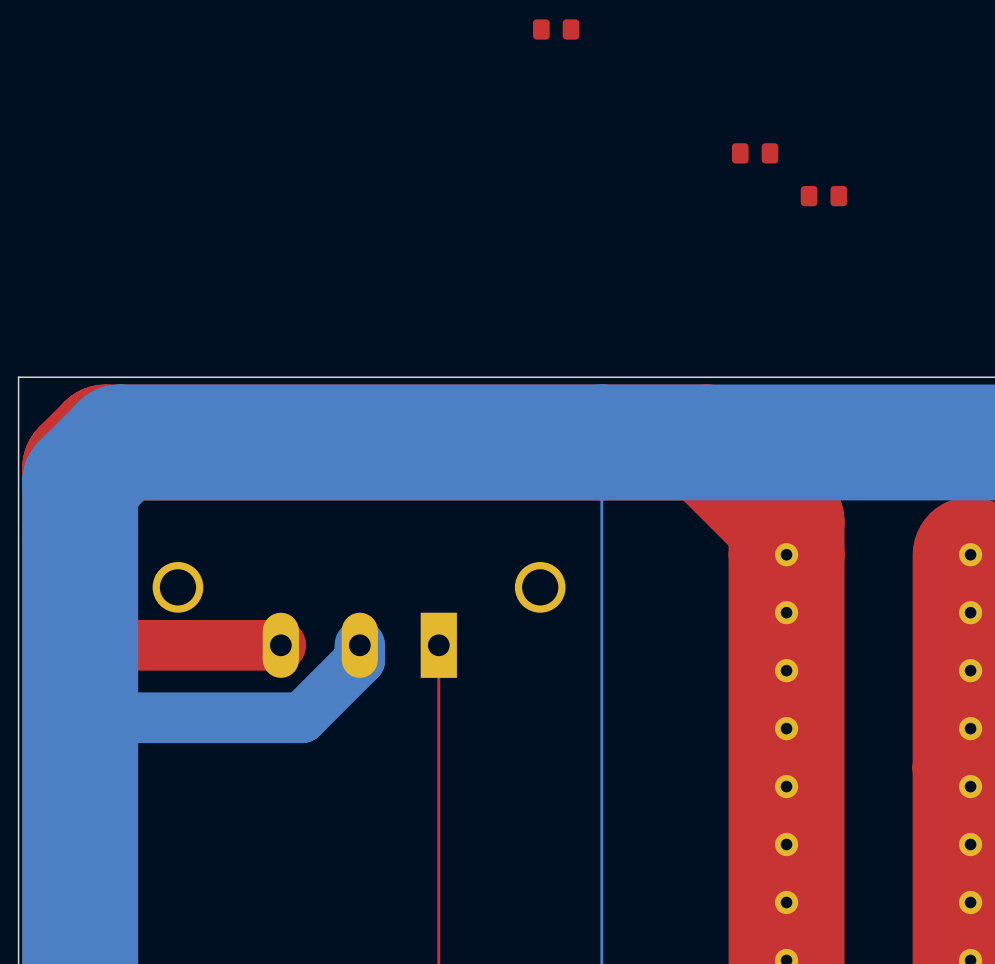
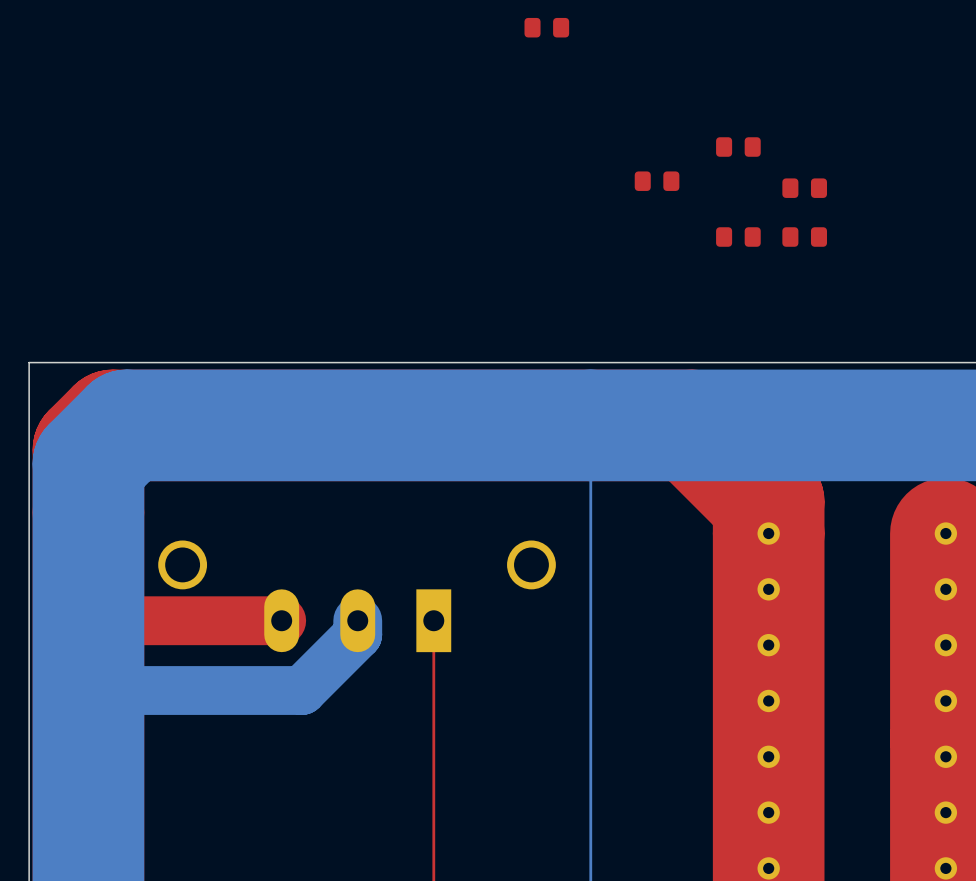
part: none -> (657, 181)
part: none -> (738, 237)
part: none -> (804, 237)

